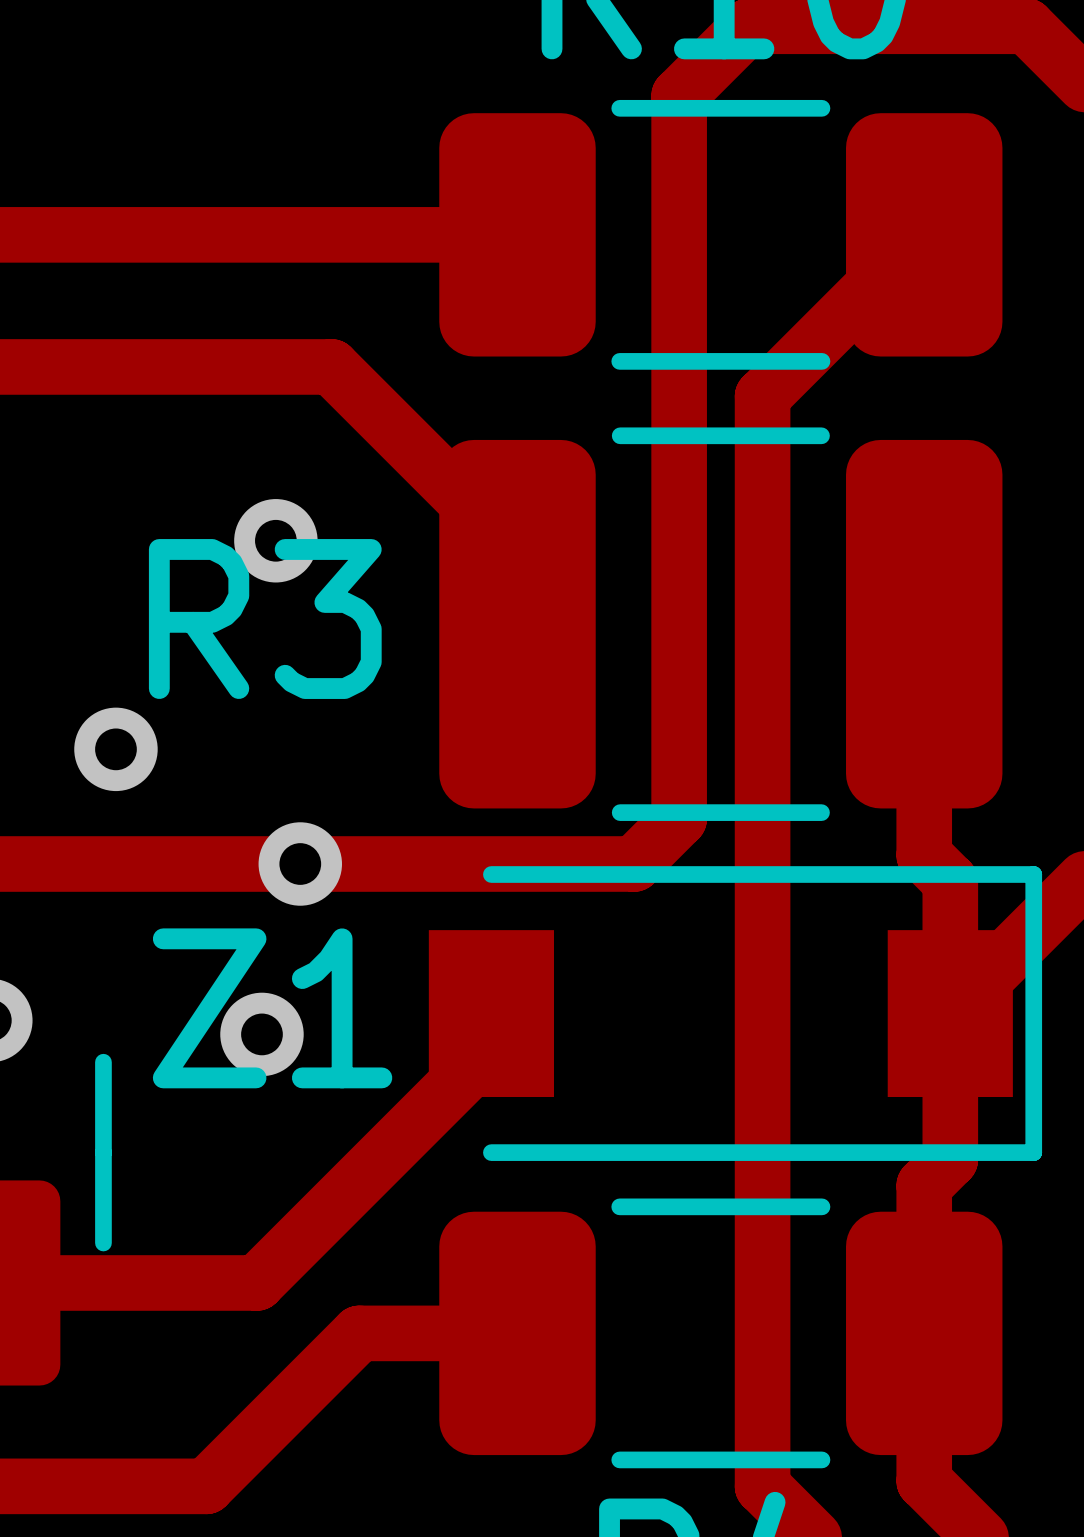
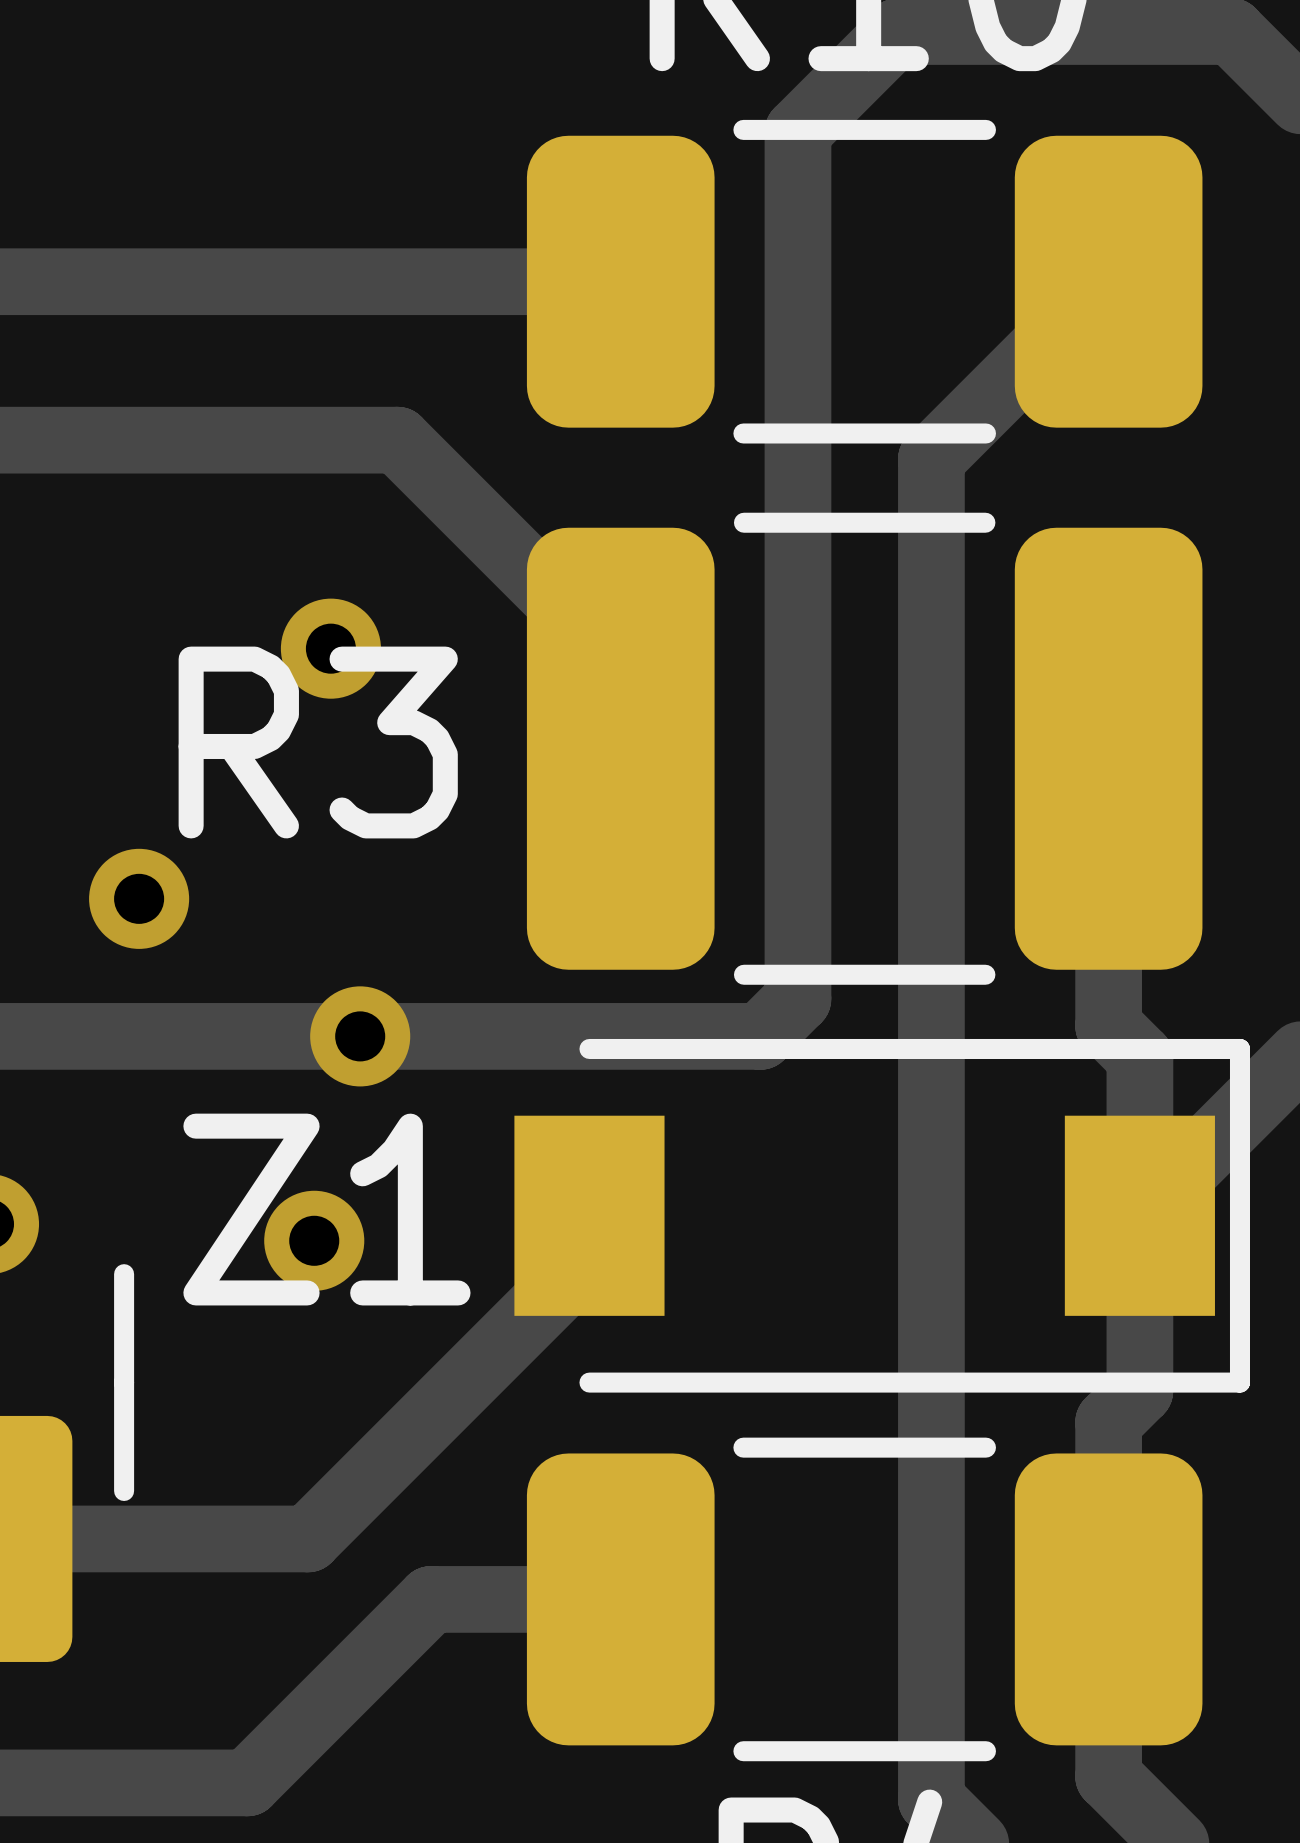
track: (679, 95) (679, 818) (665, 832) -> (814, 114) (797, 131) (797, 998)
track: (776, 382) (762, 396) (762, 1486) (776, 1500) -> (931, 458) (931, 1799)

